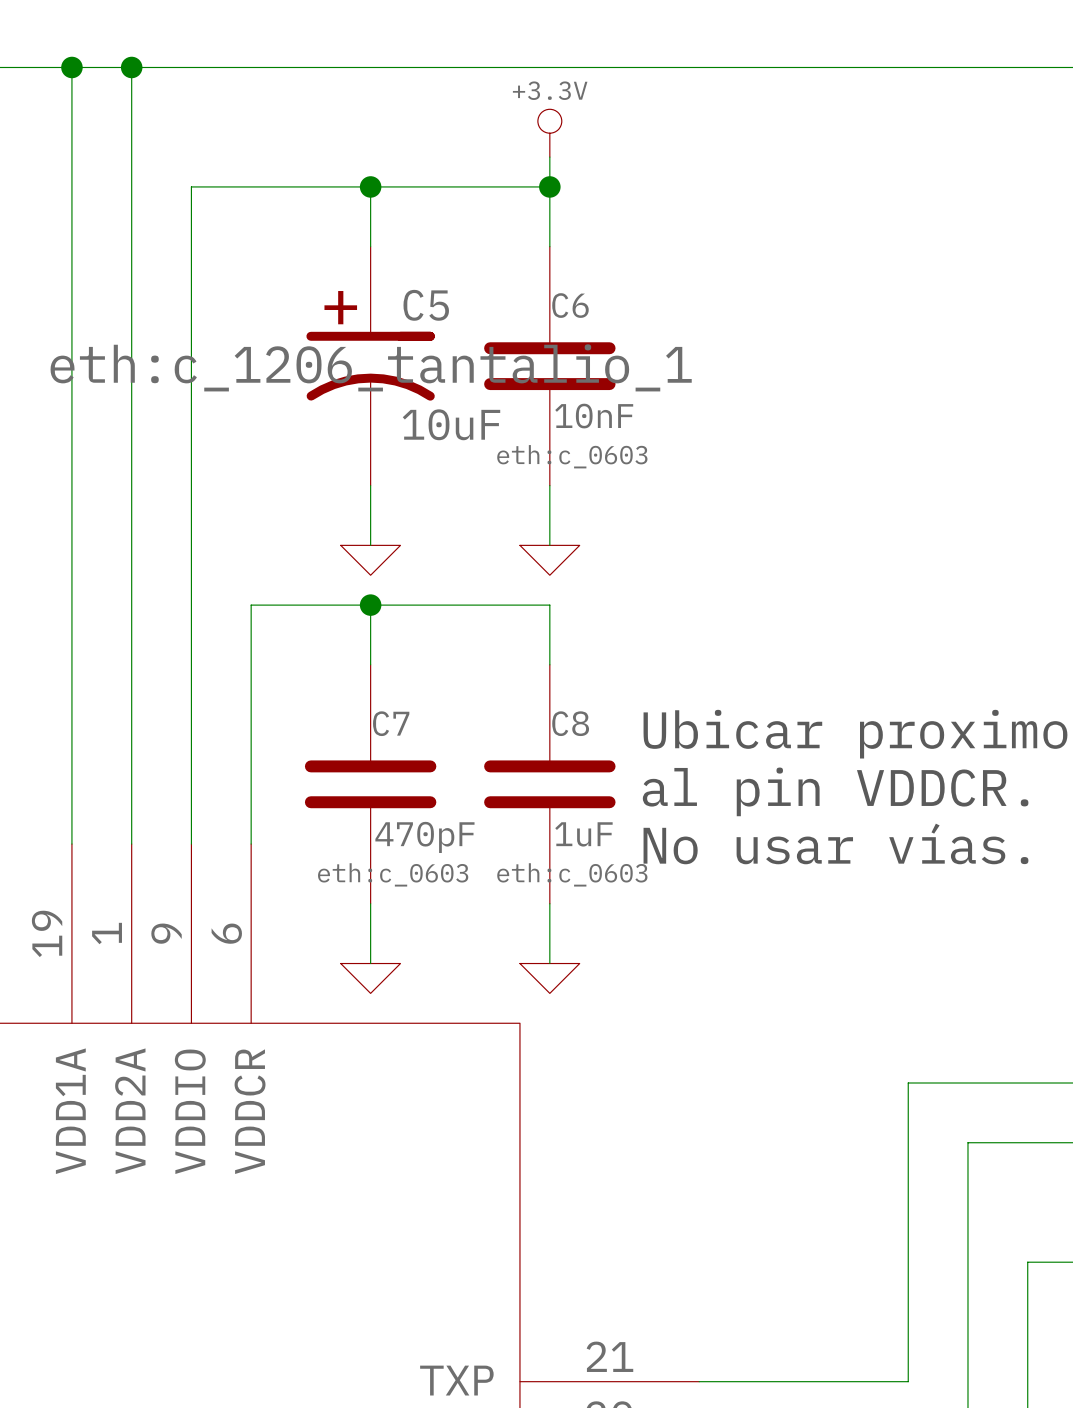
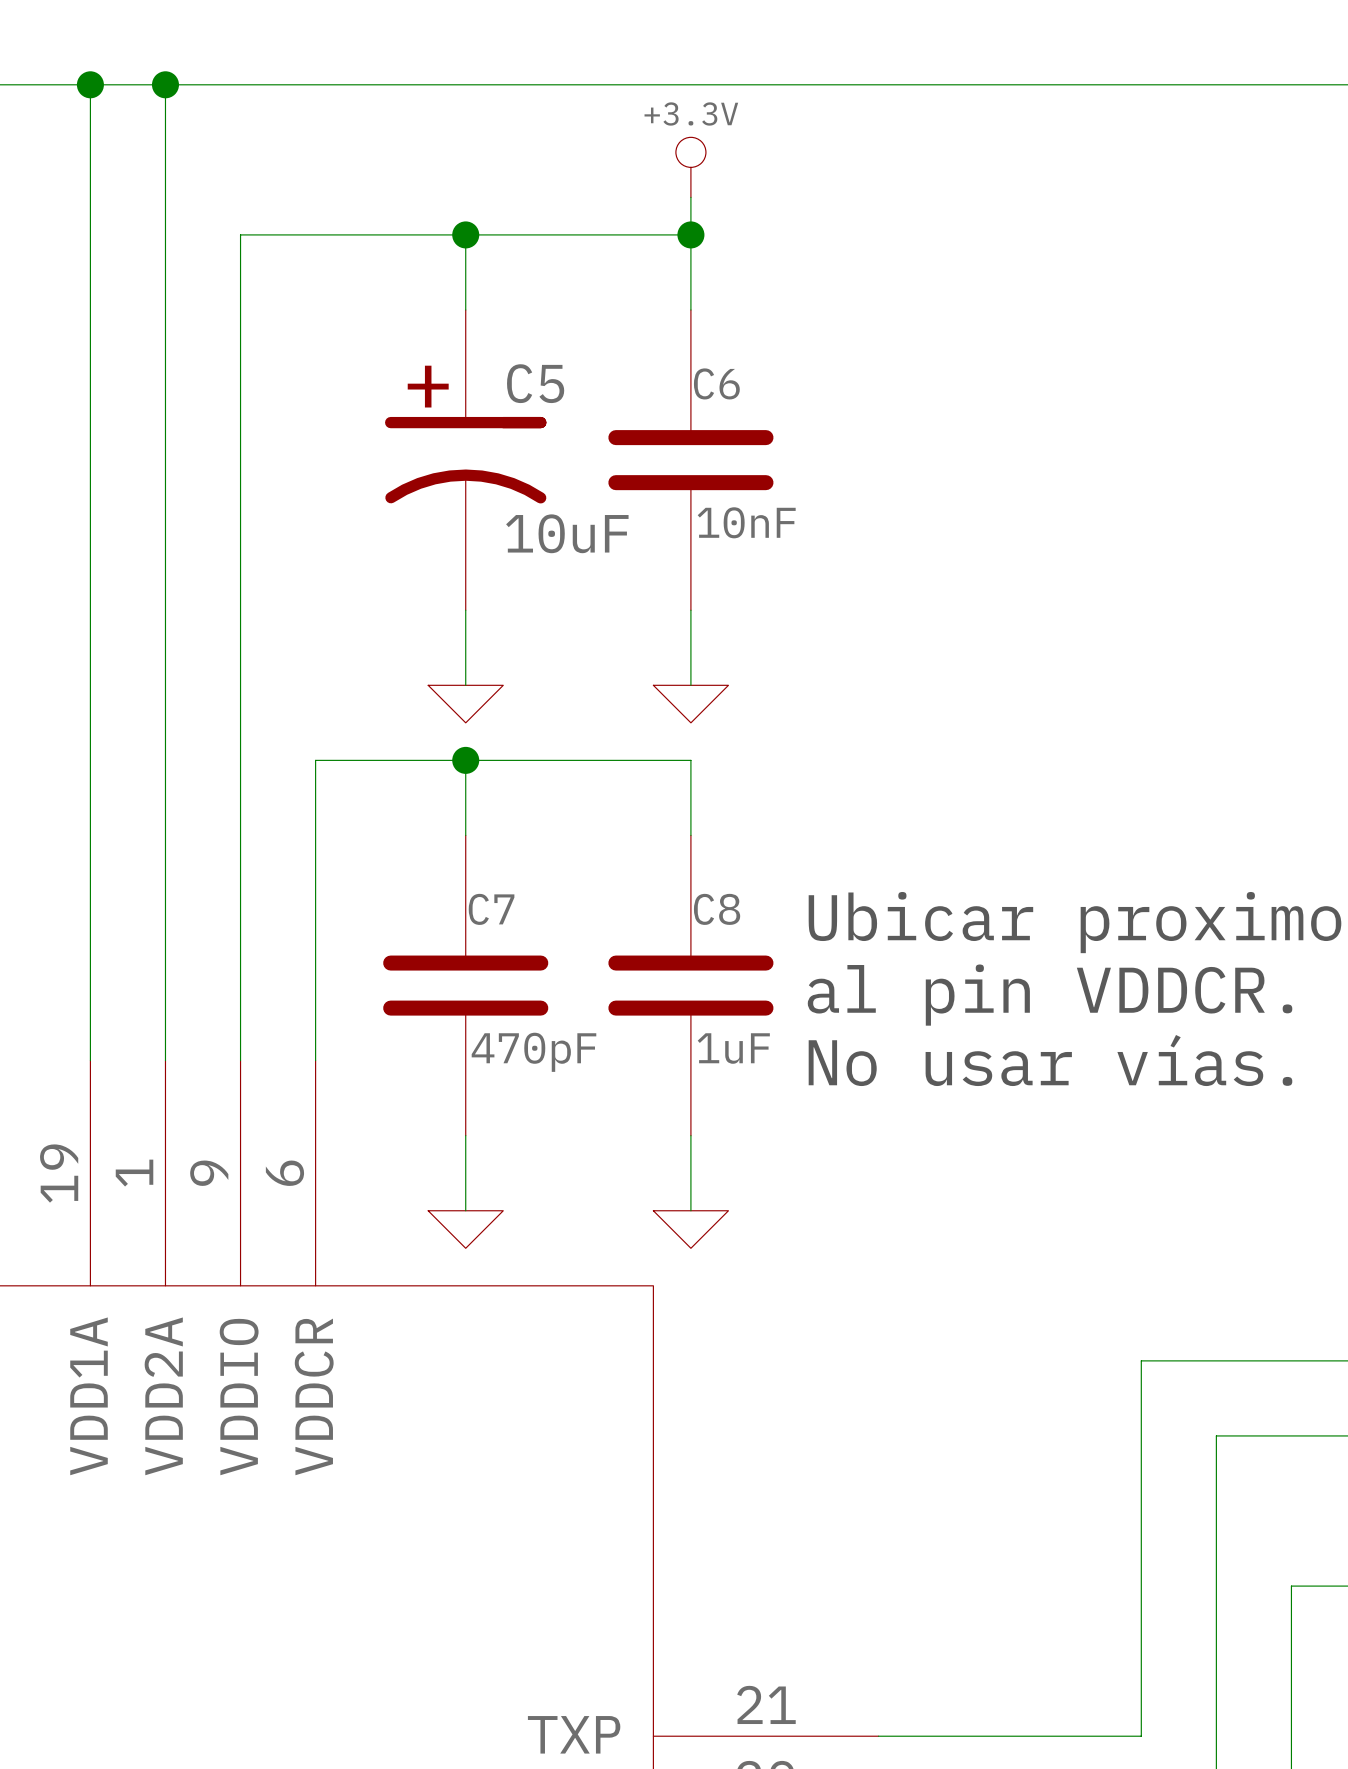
C5 text: eth:c_1206_tantalio_1 (371, 367) -> none
C6 text: eth:c_0603 (572, 456) -> none
C7 text: eth:c_0603 (393, 874) -> none
C8 text: eth:c_0603 (572, 874) -> none

